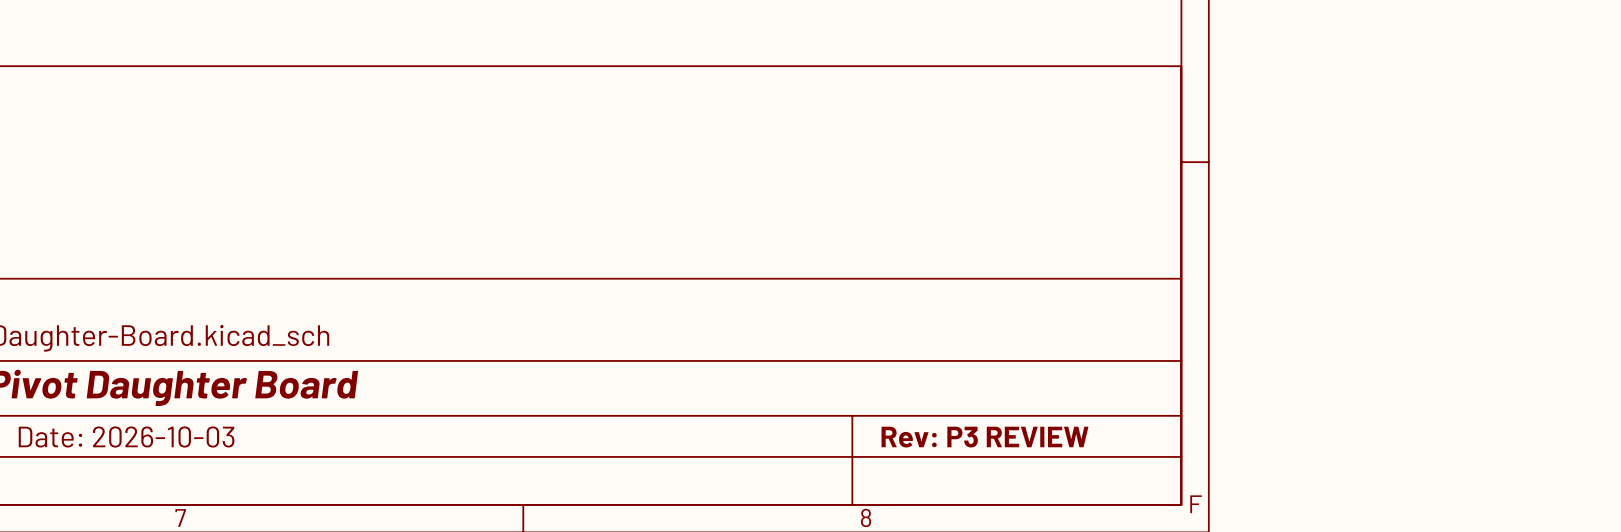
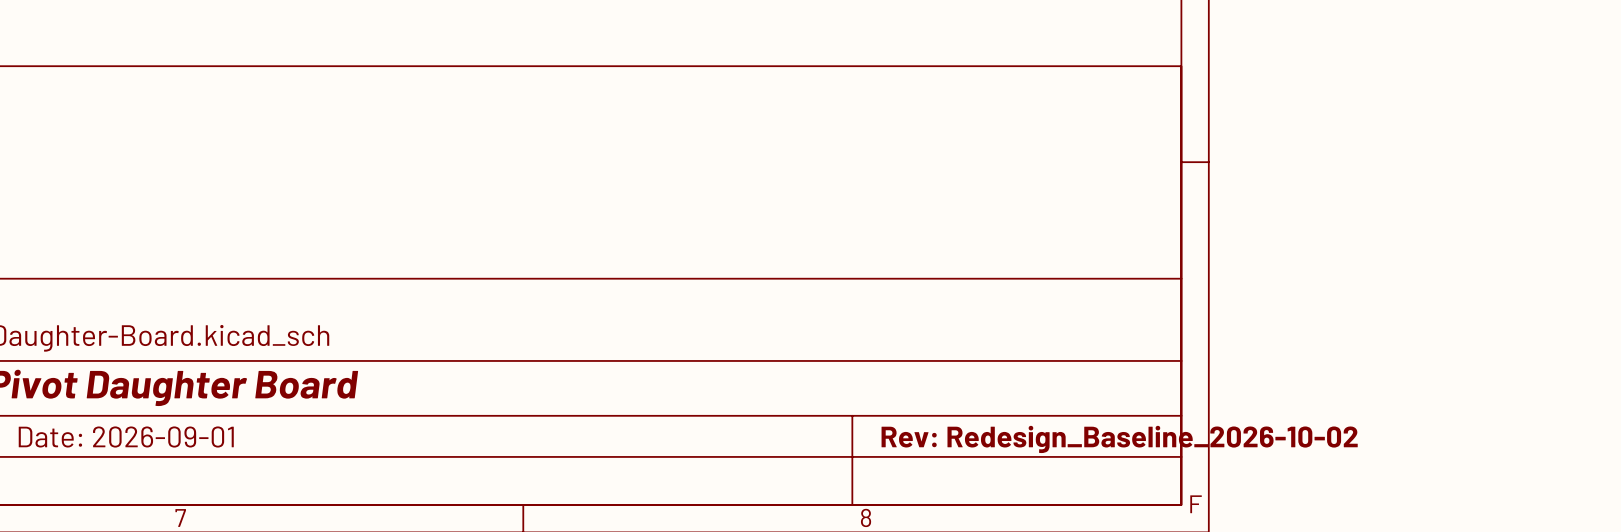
title block: Date: 2026-10-03 (126, 437) -> Date: 2026-09-01 (126, 437)
title block: Rev: P3 REVIEW (985, 437) -> Rev: Redesign_Baseline_2026-10-02 (1119, 439)

